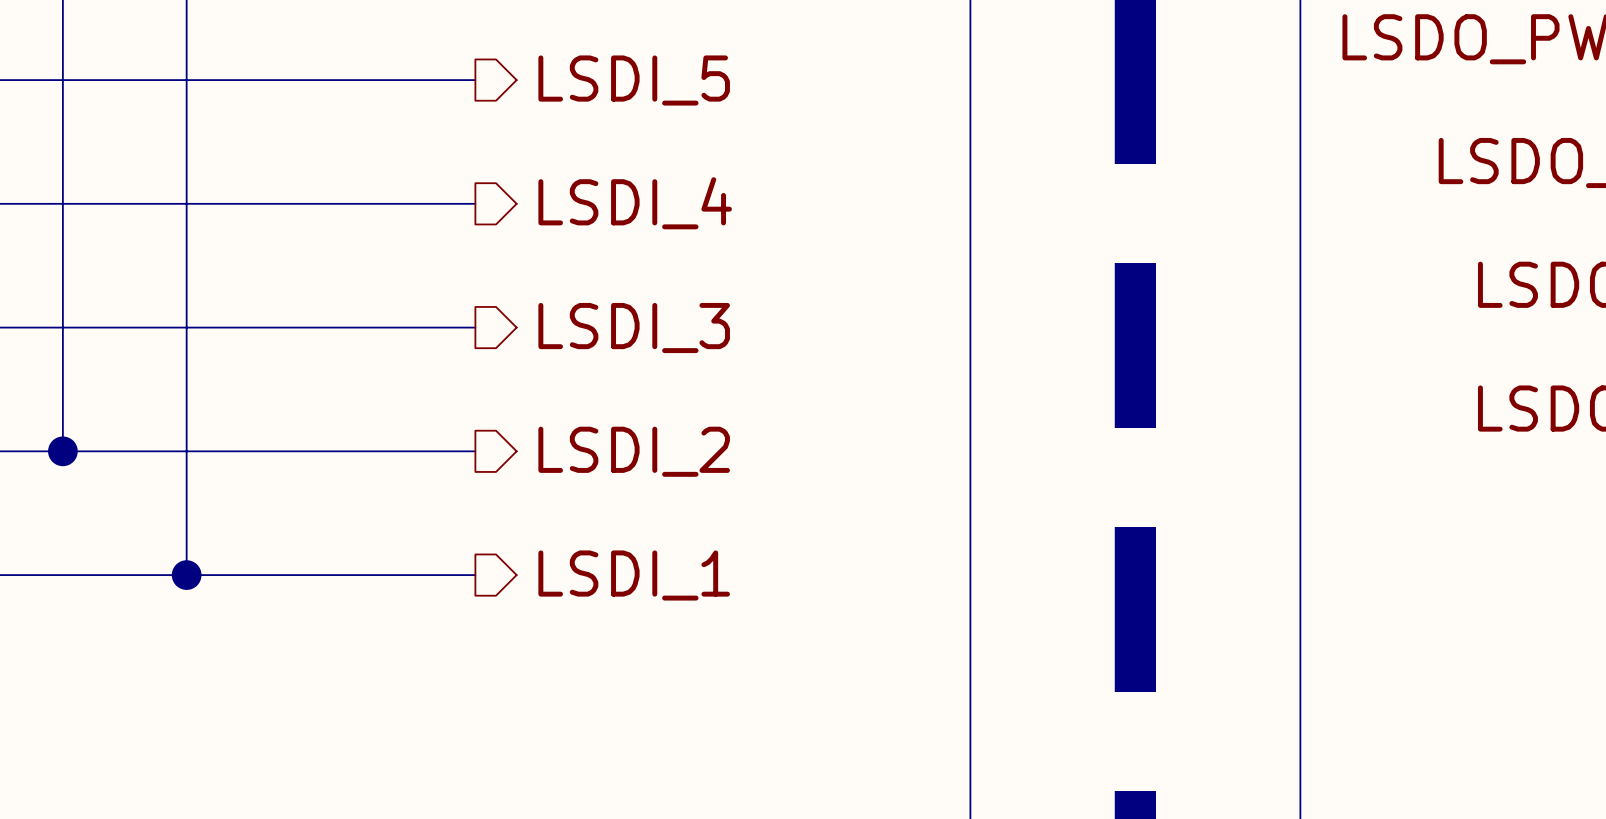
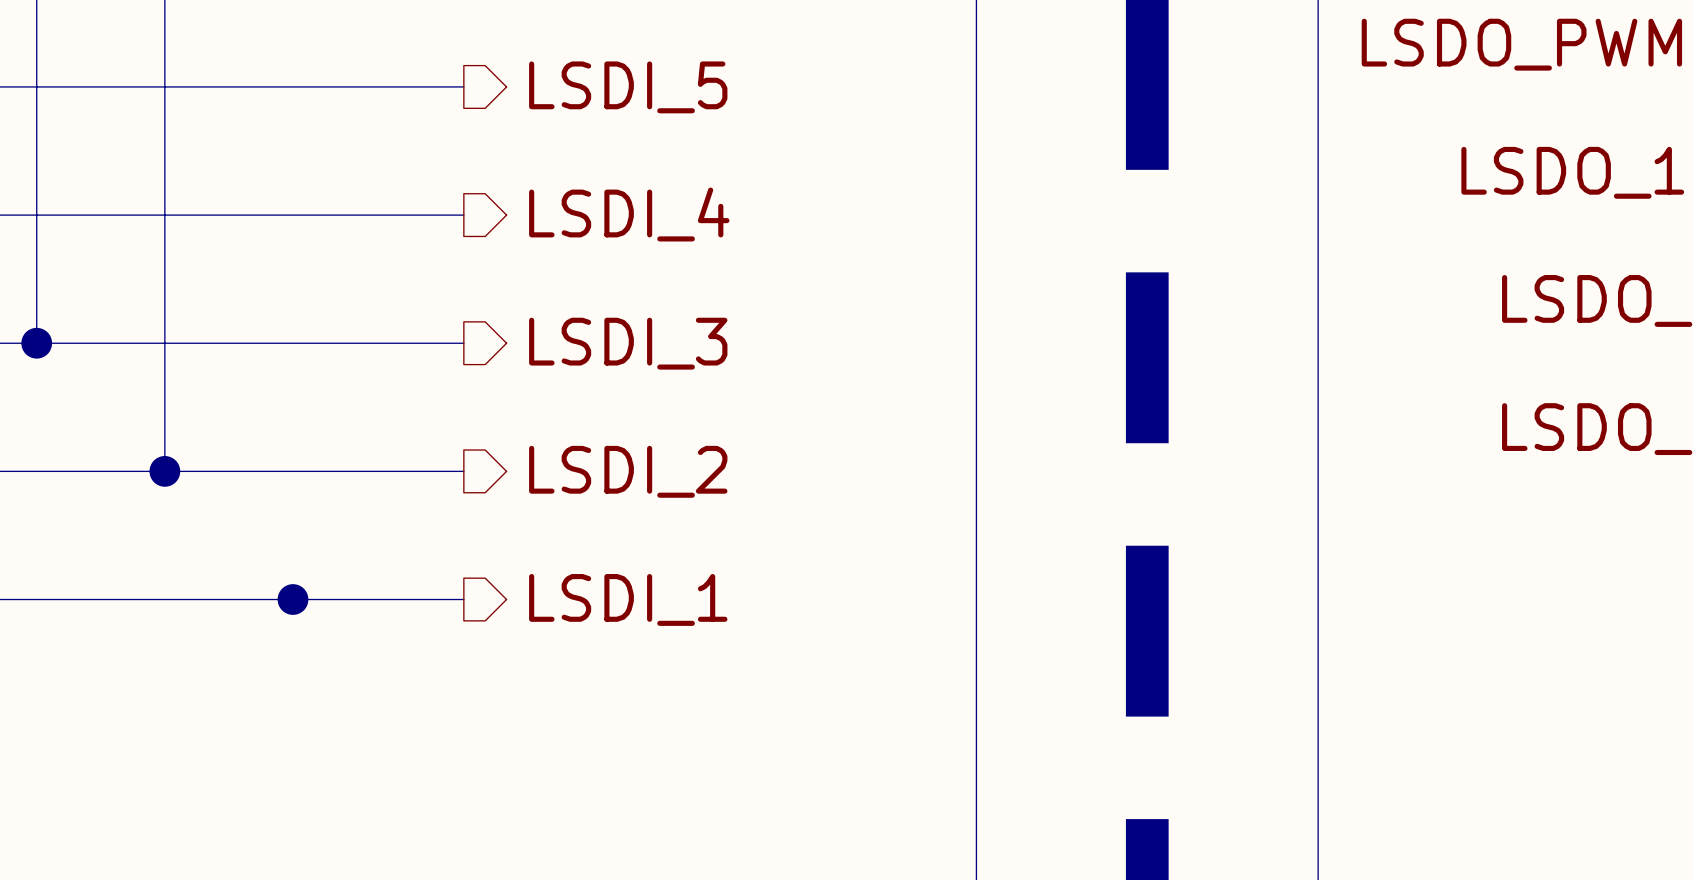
wire: (62, 327) (62, 451) -> none
junction: none -> (36, 343)
junction: (62, 451) -> none
wire: (186, 451) (186, 575) -> none
junction: none -> (164, 471)
junction: (186, 575) -> none
junction: none -> (293, 599)

